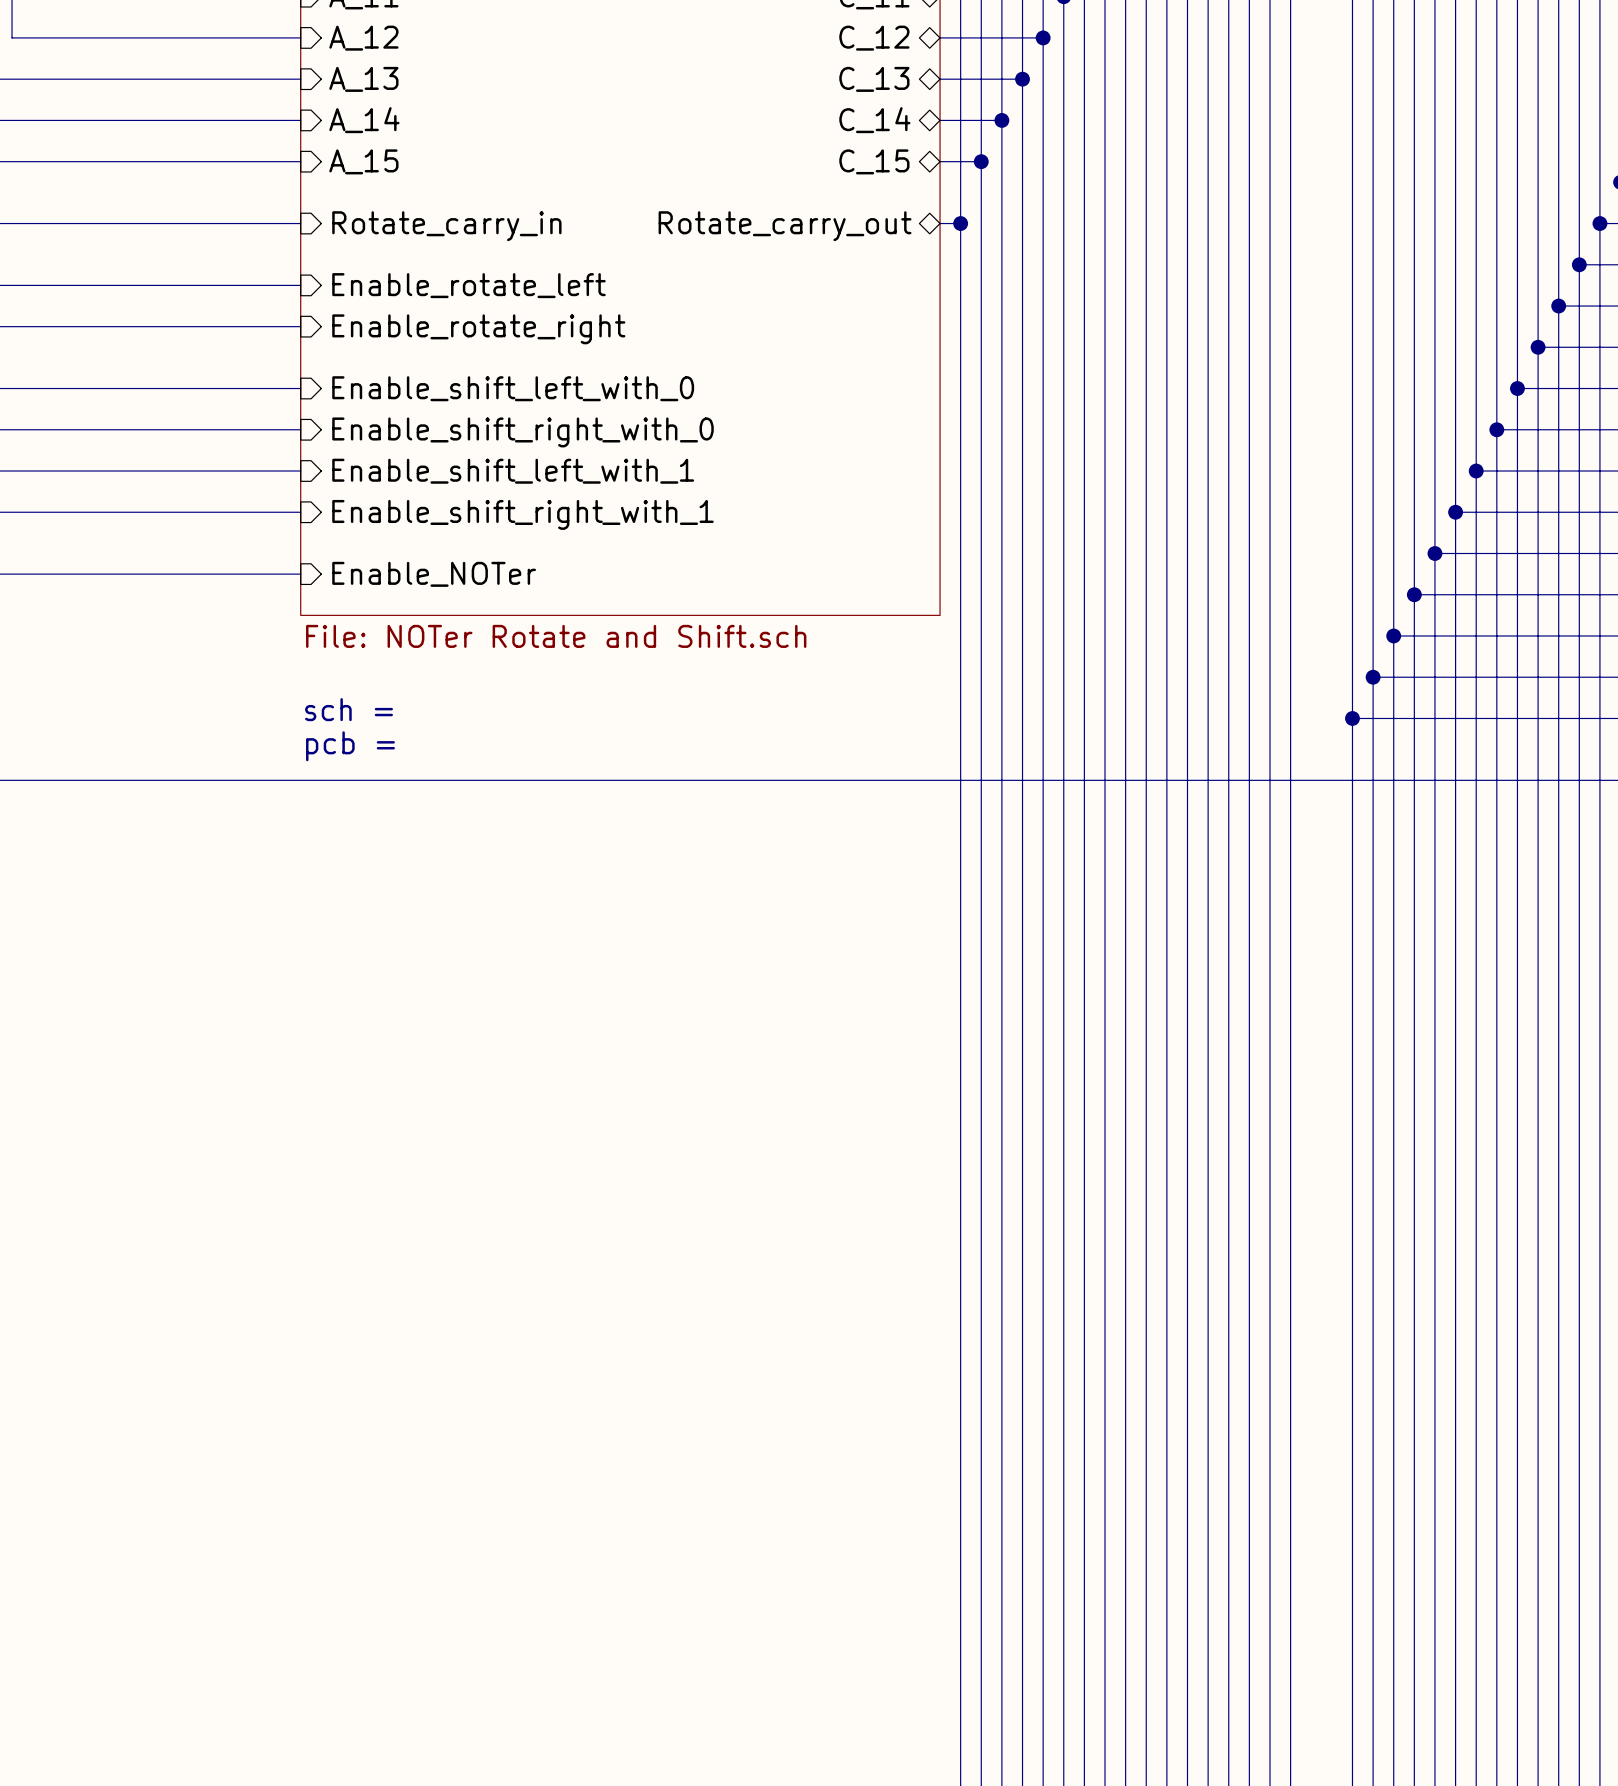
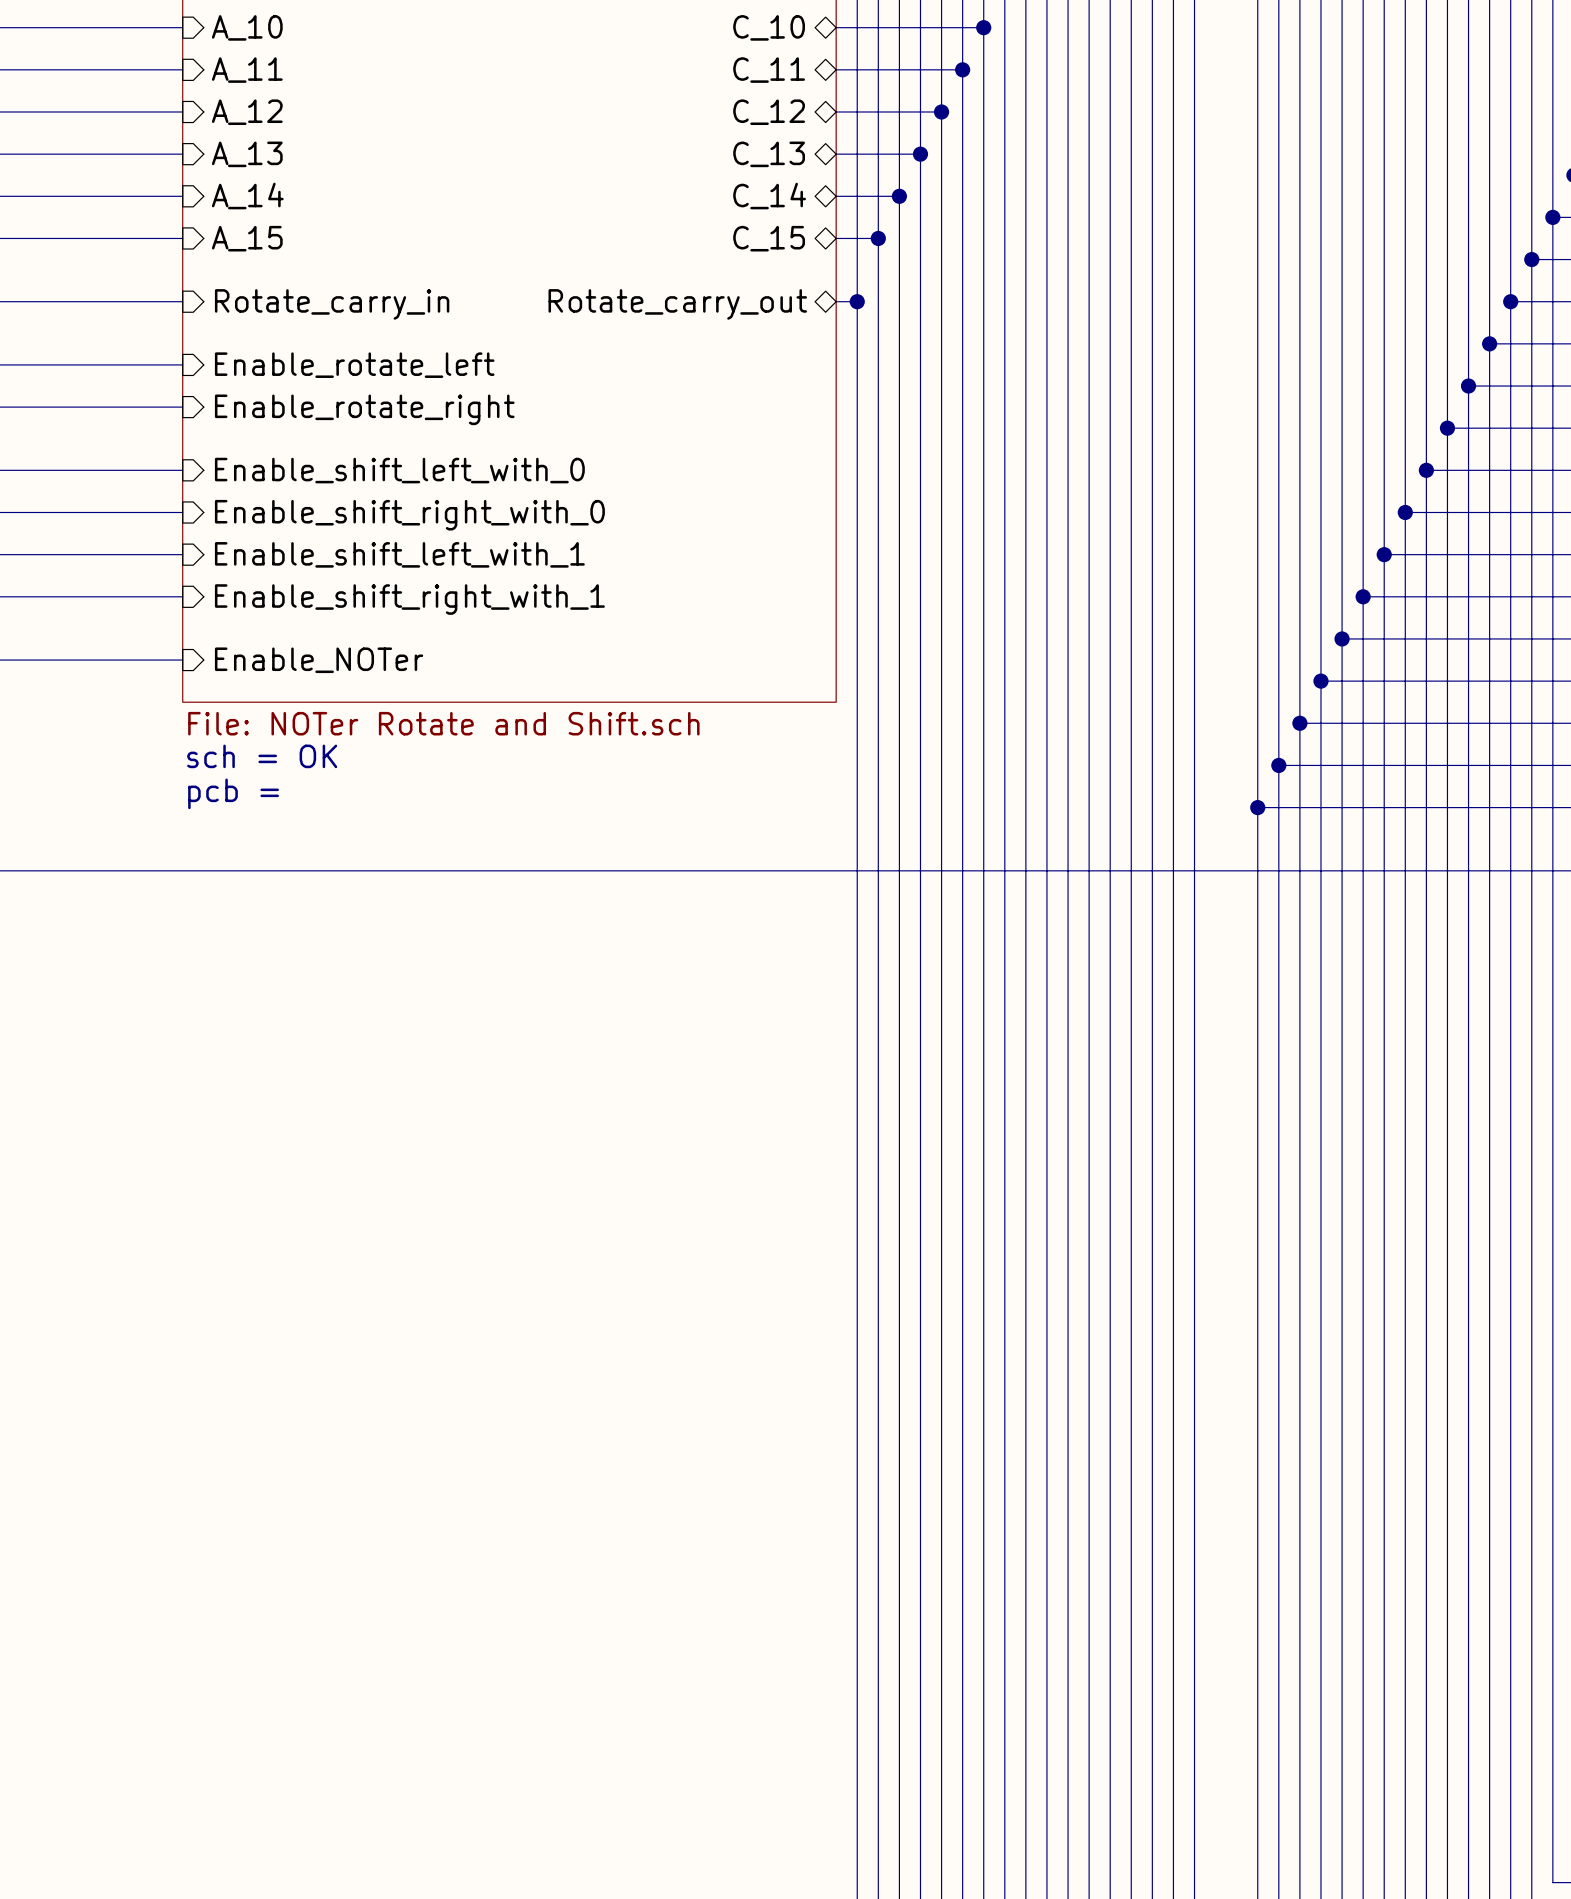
text: sch = (349, 709) -> sch = OK (262, 756)
text position: pcb = (350, 746) -> pcb = (233, 793)

